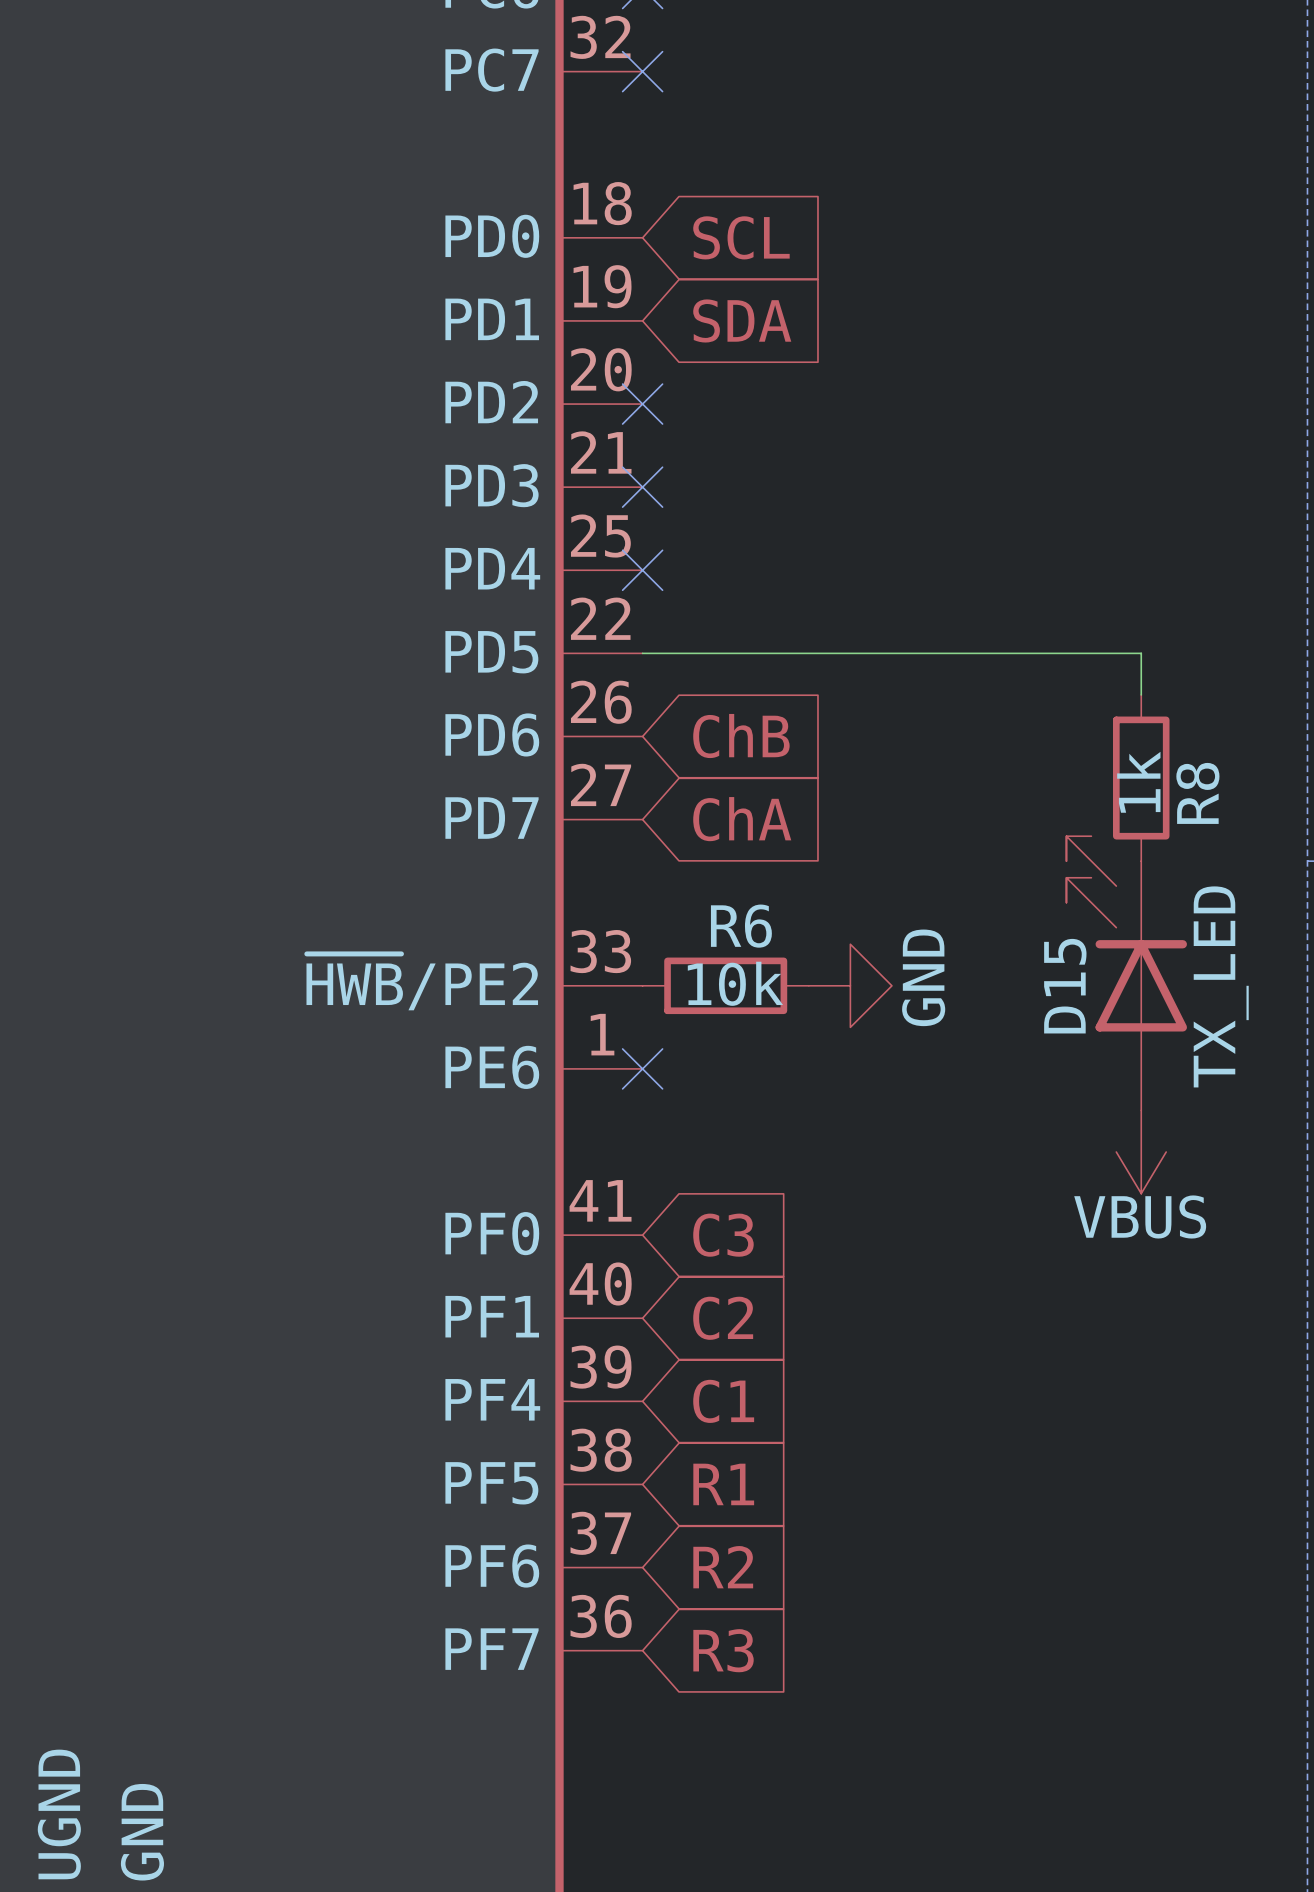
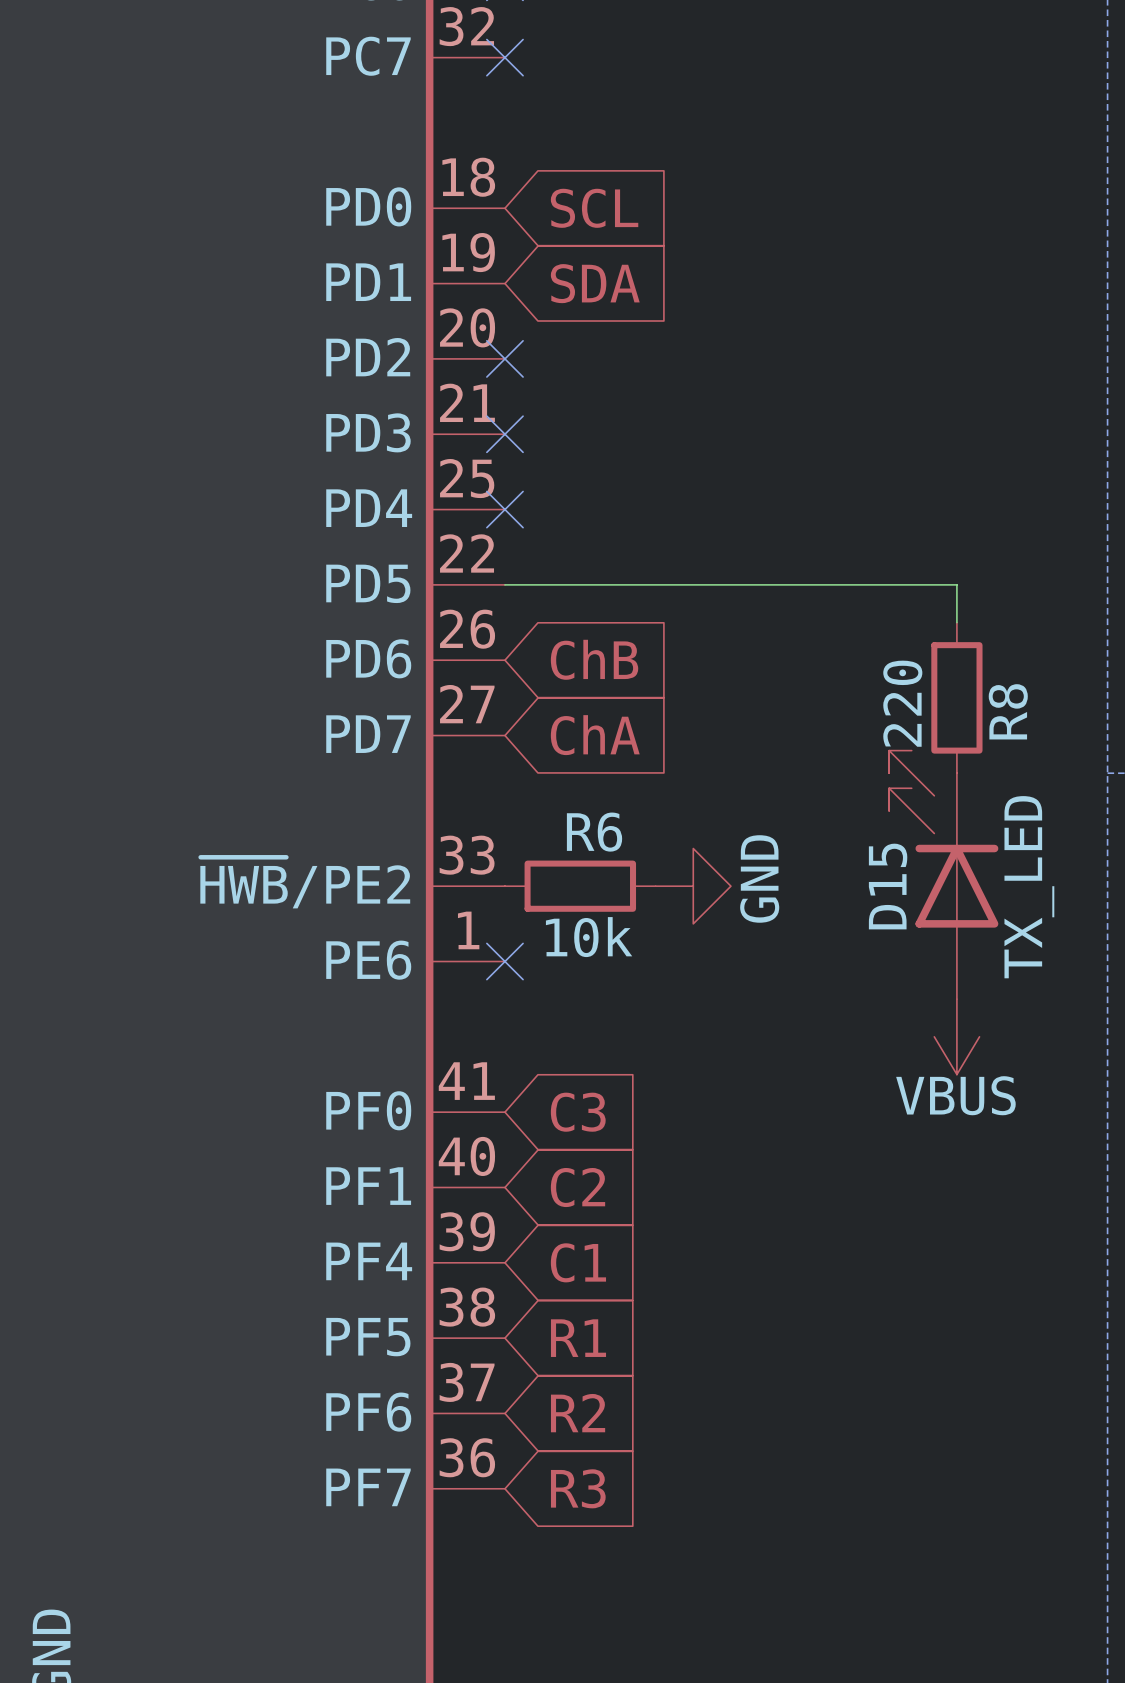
R8 value: 1k (1138, 782) -> 220 (902, 703)
R6 value position: 10k (735, 983) -> 10k (589, 937)

